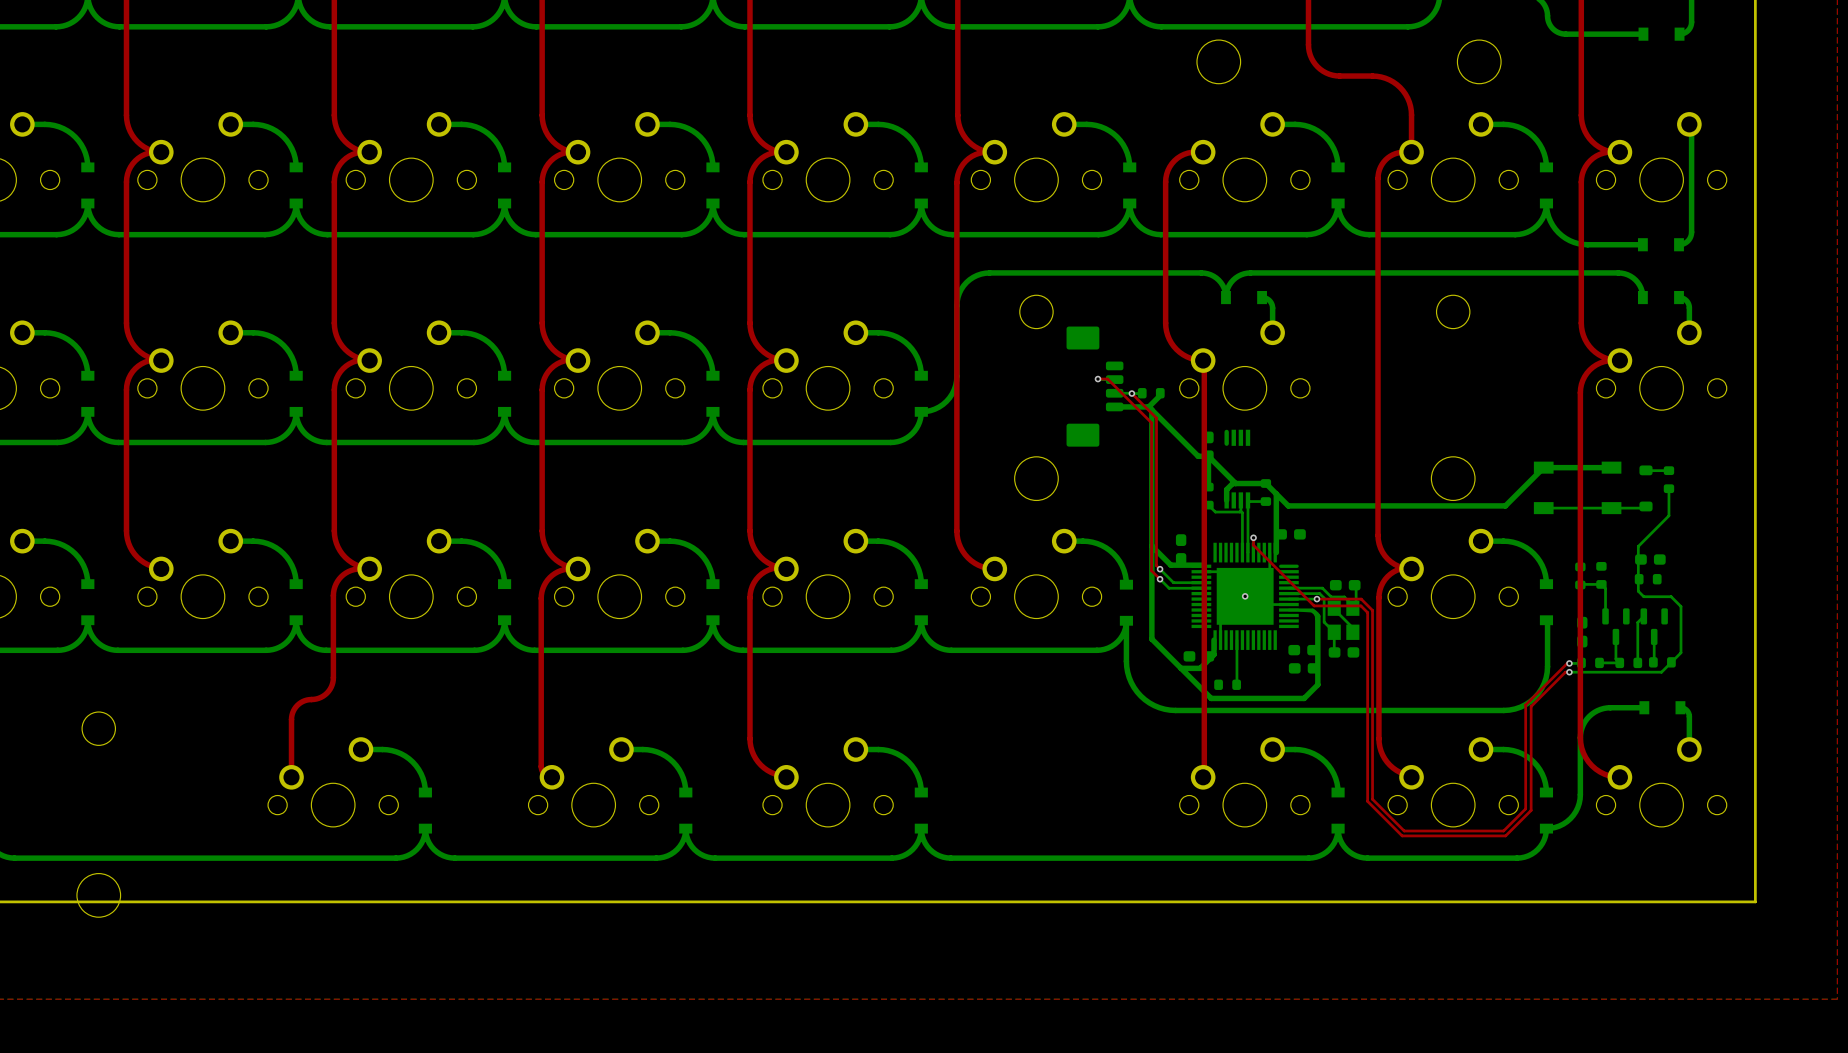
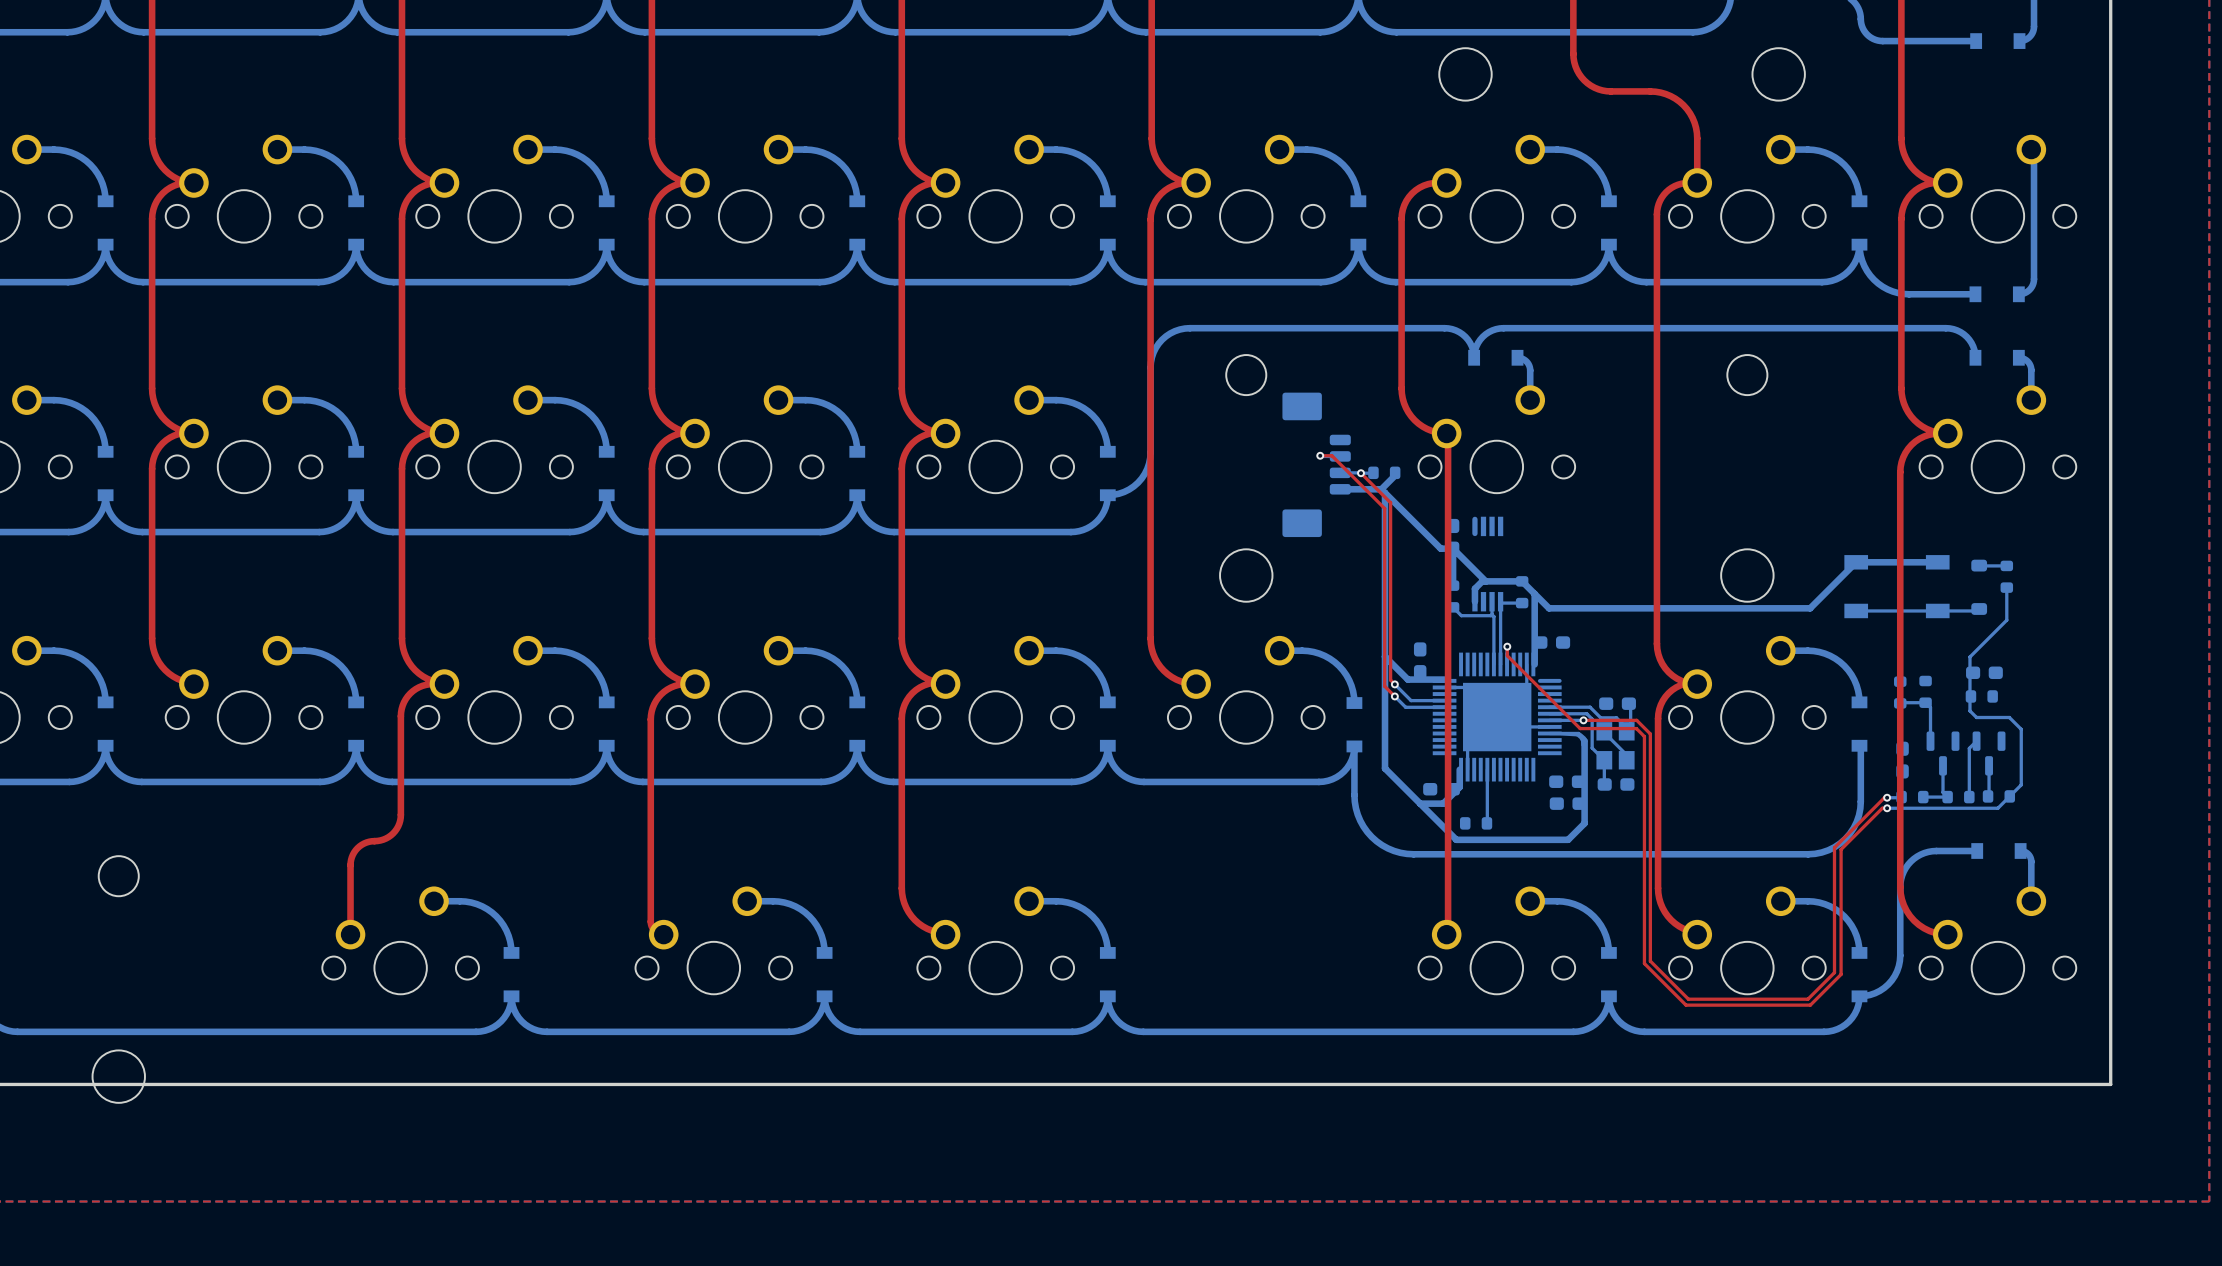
via: (1245, 596) -> none

